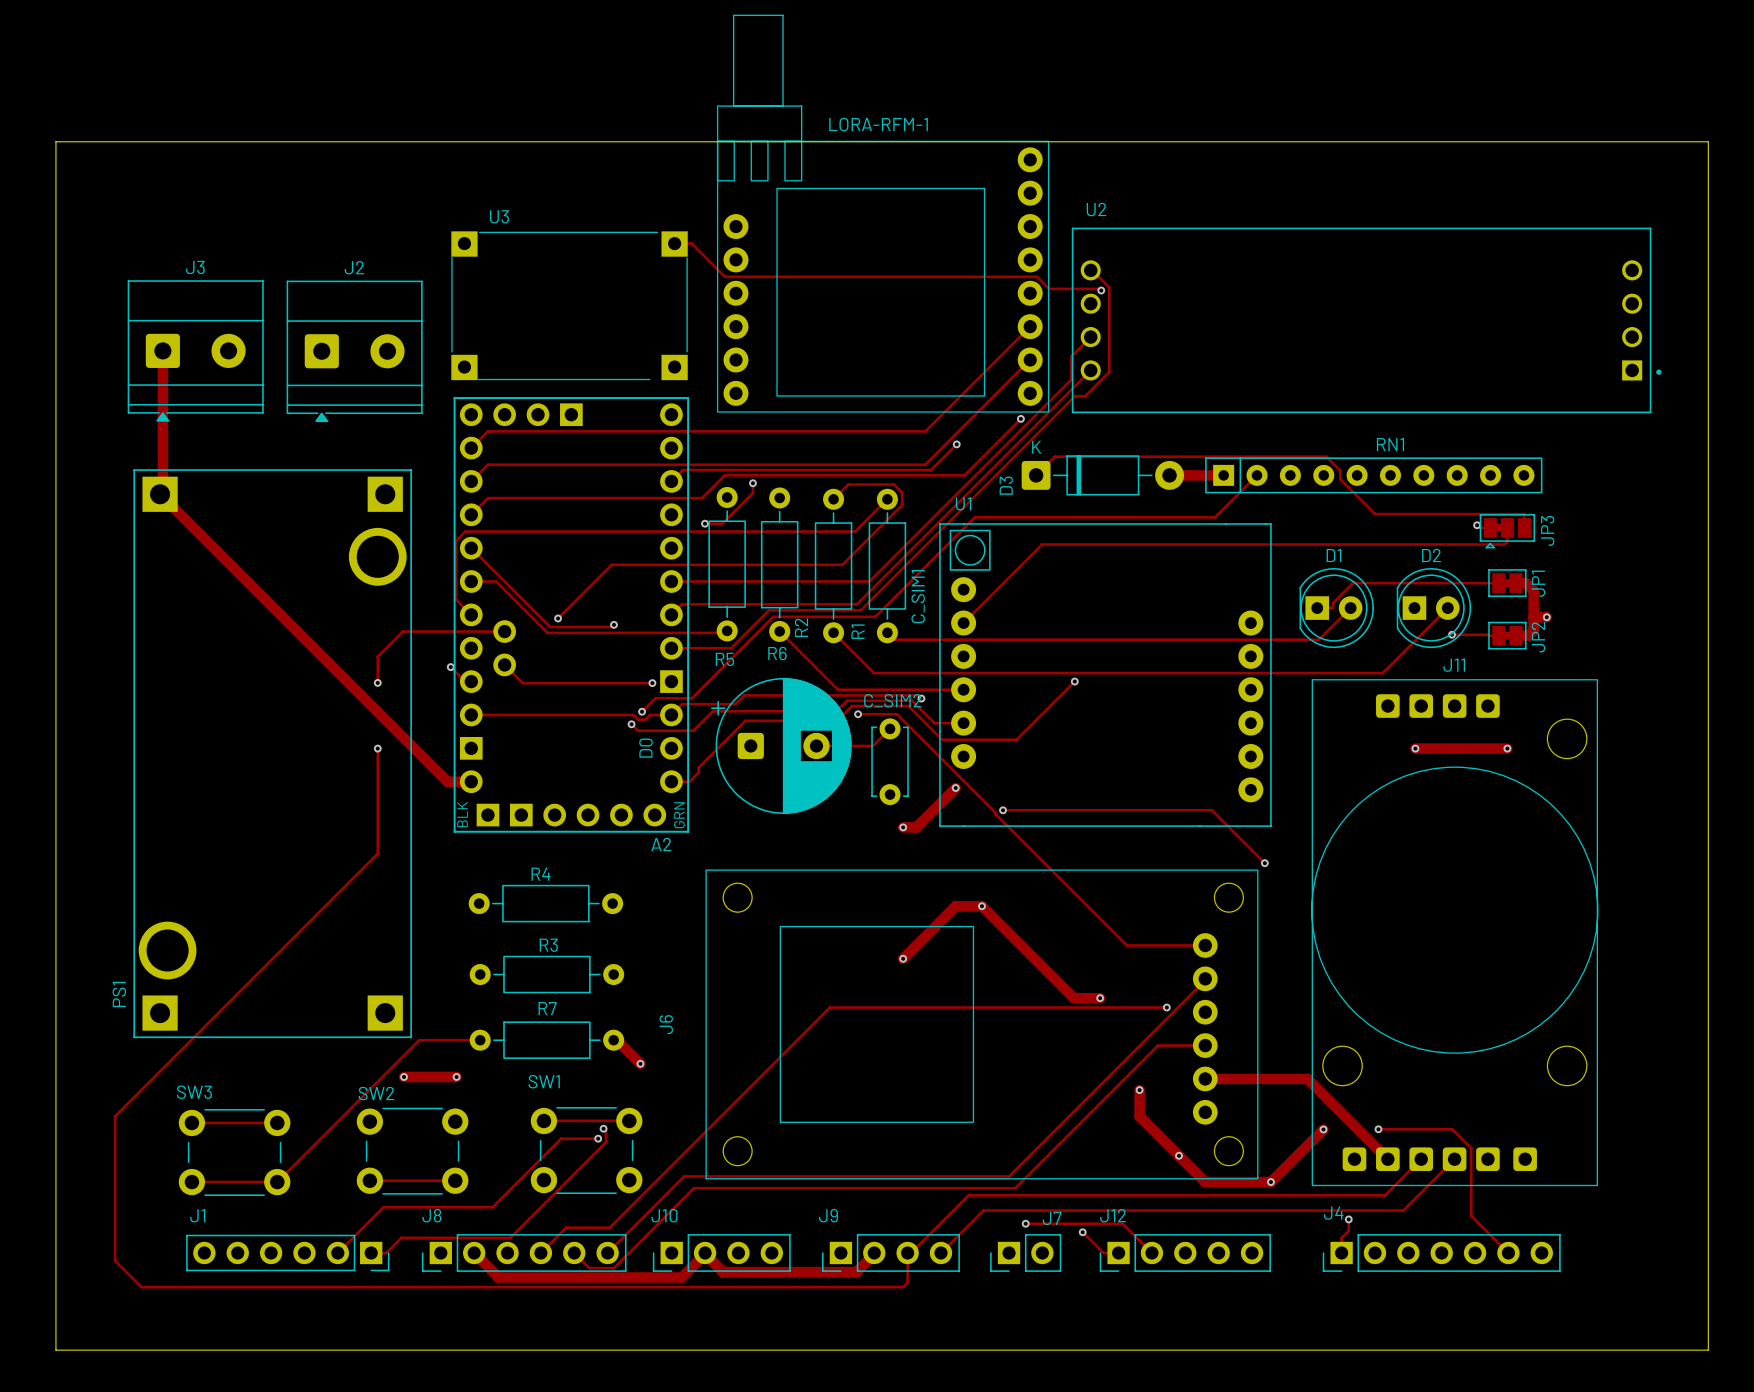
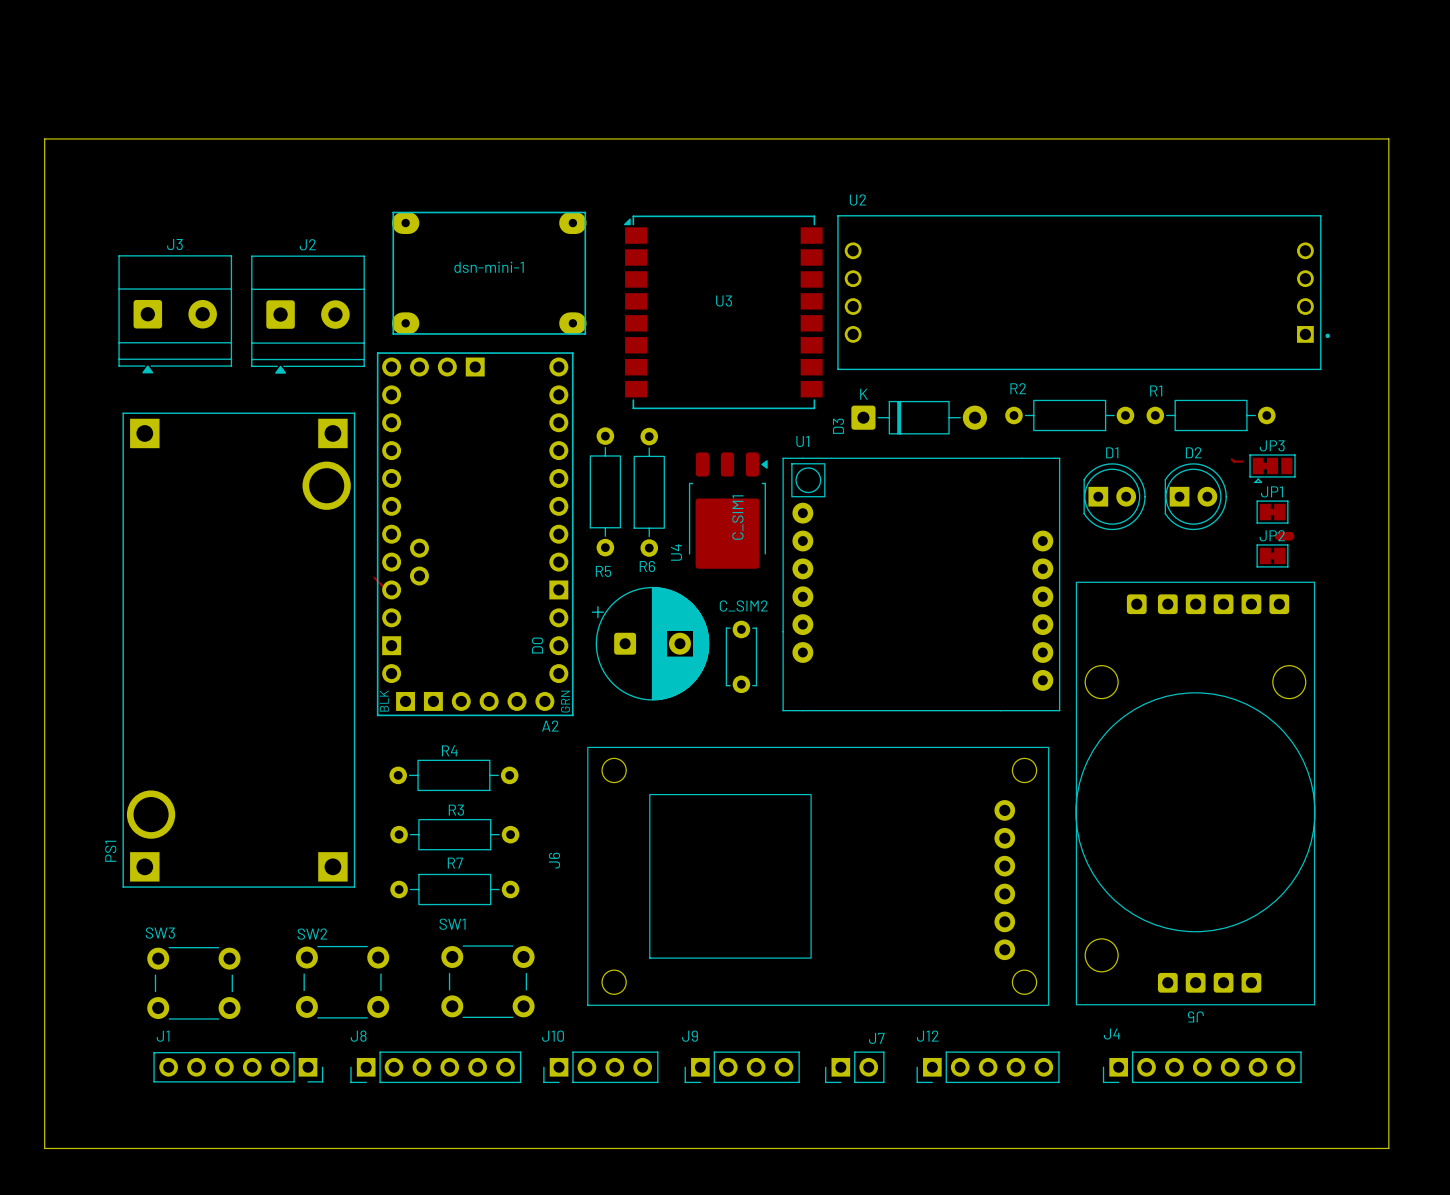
board edge: (1665, 141) (1708, 141) (1708, 1350) (1665, 1350) -> (1388, 138) (1388, 1148)
LORA-RFM-1: (883, 213) -> none
U3 name position: U3 (499, 216) -> U3 (724, 301)
U3 footprint: [451, 231, 688, 381] -> [623, 215, 823, 410]
track: (674, 243) (691, 243) (724, 276) (1037, 276) (1049, 288) (1099, 288) (1101, 290) -> none
track: (1090, 270) (1109, 287) (1109, 372) (1085, 396) (1074, 396) (860, 610) (768, 610) (731, 648) (671, 648) -> none
via: (1101, 290) -> none
dsn-mini-1: none -> (489, 273)
U2 position: (1366, 320) -> (1083, 292)
track: (1030, 326) (925, 431) (487, 431) (471, 448) -> none
track: (1090, 337) (1071, 356) (1071, 379) (869, 581) (671, 581) -> none
track: (162, 350) (162, 491) (160, 494) (447, 781) (471, 781) -> none
J3 position: (195, 350) -> (175, 314)
J2 position: (354, 351) -> (308, 314)
track: (1030, 359) (925, 464) (487, 464) (471, 481) -> none
track: (1090, 370) (856, 604) (682, 604) (671, 614) -> none
track: (1020, 418) (964, 475) (724, 475) (702, 498) (487, 498) (471, 514) -> none
via: (1020, 418) -> none
track: (956, 444) (931, 470) (682, 470) (671, 481) -> none
via: (956, 444) -> none
track: (1036, 475) (1054, 456) (1326, 456) (1340, 470) (1340, 479) (1375, 514) (1524, 514) (1524, 527) -> none
track: (1169, 475) (1223, 475) -> none
track: (1257, 475) (1215, 517) (974, 517) (875, 616) (773, 616) (691, 698) (655, 698) (642, 711) -> none
RN1: (1373, 475) -> none
track: (752, 483) (752, 493) (722, 523) (705, 523) -> none
via: (752, 483) -> none
track: (833, 499) (848, 484) (894, 484) (902, 492) (902, 505) (842, 564) (611, 564) (558, 618) -> none
track: (887, 499) (855, 531) (465, 531) (455, 541) (455, 599) (471, 614) -> none
via: (705, 523) -> none
via: (1477, 525) -> none
track: (1507, 527) (1507, 541) (1504, 544) (1042, 544) (963, 623) -> none
JP3 name rotation: 0° (1547, 530) -> 90° clockwise (1272, 445)
JP3 position: (1507, 531) -> (1272, 468)
track: (471, 548) (550, 626) (611, 626) (613, 624) -> none
R2 rotation: 0° (833, 566) -> 90° clockwise (1069, 415)
R2 position: (833, 566) -> (1069, 415)
R1 rotation: 0° (887, 566) -> 90° clockwise (1211, 415)
R1 position: (887, 566) -> (1211, 415)
track: (471, 581) (496, 581) (547, 632) (725, 632) (727, 630) -> none
track: (1498, 583) (1353, 583) (1333, 603) (1333, 608) (1317, 608) -> none
JP1 position: (1507, 583) -> (1272, 512)
track: (1515, 583) (1525, 583) (1533, 590) (1533, 630) (1528, 635) (1515, 635) -> none
JP1 name rotation: 0° (1538, 583) -> 90° clockwise (1271, 491)
U4: none -> (728, 510)
C_SIM1 name position: C_SIM1 (918, 596) -> C_SIM1 (737, 517)
D1 position: (1336, 608) -> (1114, 496)
track: (1350, 608) (1318, 639) (894, 639) (887, 632) -> none
D2 position: (1433, 608) -> (1195, 496)
track: (1447, 608) (1382, 673) (873, 673) (833, 632) -> none
via: (1546, 617) -> none
via: (558, 618) -> none
via: (613, 624) -> none
track: (504, 631) (402, 631) (377, 656) (377, 682) -> none
track: (779, 631) (838, 689) (963, 689) -> none
track: (1451, 634) (1498, 635) -> none
via: (1451, 634) -> none
JP2 position: (1507, 635) -> (1272, 555)
JP2 name rotation: 0° (1538, 637) -> 90° clockwise (1272, 535)
track: (504, 664) (522, 683) (652, 683) -> none
via: (450, 667) -> none
track: (1074, 681) (1016, 739) (942, 739) (908, 705) (852, 705) (837, 720) (745, 720) (698, 767) (698, 772) (689, 781) (671, 781) -> none
via: (1074, 681) -> none
via: (377, 682) -> none
via: (652, 683) -> none
track: (921, 698) (918, 695) (744, 695) (735, 704) (682, 704) (671, 714) (649, 714) (645, 719) (638, 719) (633, 714) (471, 714) -> none
via: (921, 698) -> none
via: (642, 711) -> none
track: (858, 714) (896, 714) (1127, 945) (1205, 945) -> none
via: (858, 714) -> none
track: (963, 723) (934, 723) (912, 700) (847, 700) (836, 711) (712, 711) (693, 730) (638, 730) (631, 724) -> none
via: (631, 724) -> none
track: (890, 728) (872, 745) (816, 745) -> none
track: (377, 748) (377, 853) (115, 1116) (115, 1260) (141, 1287) (903, 1287) (907, 1282) (907, 1252) (911, 1252) (968, 1195) (1385, 1195) (1421, 1159) -> none
via: (377, 748) -> none
track: (1415, 748) (1507, 748) -> none
via: (1415, 748) -> none
via: (1507, 748) -> none
PS1 position: (272, 753) -> (238, 650)
track: (955, 788) (916, 827) (903, 827) -> none
via: (955, 788) -> none
track: (1003, 810) (1211, 810) (1264, 863) -> none
via: (1003, 810) -> none
via: (903, 827) -> none
via: (1264, 863) -> none
via: (981, 906) -> none
J5: none -> (1195, 793)
J11: (1454, 932) -> none
track: (903, 958) (955, 906) (981, 906) (1073, 998) (1100, 998) -> none
via: (903, 958) -> none
track: (1205, 978) (1009, 1176) (684, 1176) (607, 1252) -> none
via: (1100, 998) -> none
track: (1166, 1007) (829, 1007) (609, 1227) (566, 1227) (540, 1252) -> none
via: (1166, 1007) -> none
J6 name position: J6 (666, 1024) -> J6 (554, 860)
track: (480, 1040) (419, 1040) (277, 1182) (191, 1182) -> none
track: (616, 1040) (640, 1063) -> none
track: (1205, 1045) (1157, 1045) (1015, 1188) (693, 1188) (613, 1268) (589, 1268) (574, 1252) -> none
via: (640, 1063) -> none
track: (404, 1076) (456, 1076) -> none
via: (404, 1076) -> none
via: (456, 1076) -> none
track: (1205, 1078) (1307, 1078) (1387, 1159) -> none
track: (1139, 1090) (1139, 1116) (1205, 1182) (1270, 1182) (1323, 1129) -> none
via: (1139, 1090) -> none
track: (544, 1120) (629, 1120) -> none
track: (191, 1122) (277, 1122) -> none
track: (603, 1128) (606, 1131) (606, 1142) (510, 1237) (401, 1237) (386, 1252) (371, 1252) -> none
via: (603, 1128) -> none
via: (1323, 1129) -> none
track: (1378, 1129) (1452, 1129) (1471, 1148) (1471, 1215) (1508, 1252) -> none
via: (1378, 1129) -> none
track: (598, 1138) (561, 1138) (492, 1207) (383, 1207) (337, 1252) -> none
via: (598, 1138) -> none
via: (1179, 1155) -> none
track: (1454, 1159) (1403, 1210) (983, 1210) (940, 1252) -> none
track: (369, 1180) (455, 1180) -> none
via: (1270, 1182) -> none
track: (1348, 1219) (1348, 1230) (1341, 1237) (1341, 1252) -> none
via: (1348, 1219) -> none
track: (1025, 1223) (1122, 1223) (1151, 1252) -> none
via: (1025, 1223) -> none
track: (1082, 1232) (1103, 1252) (1118, 1252) -> none
via: (1082, 1232) -> none
track: (474, 1252) (498, 1277) (681, 1277) (705, 1254) -> none
track: (874, 1252) (856, 1272) (722, 1272) (705, 1254) -> none

